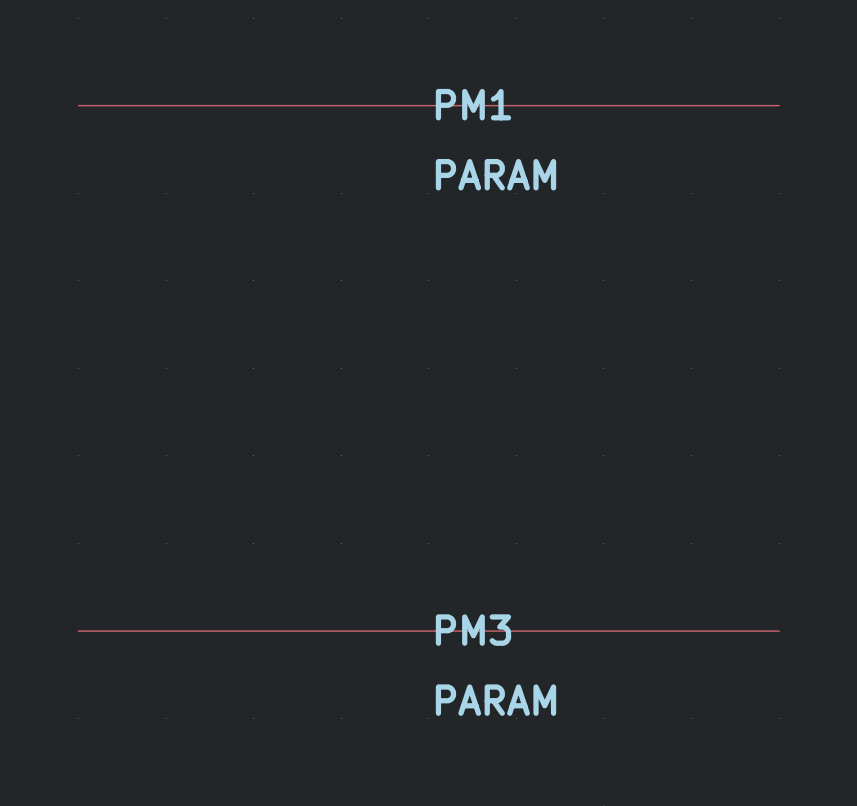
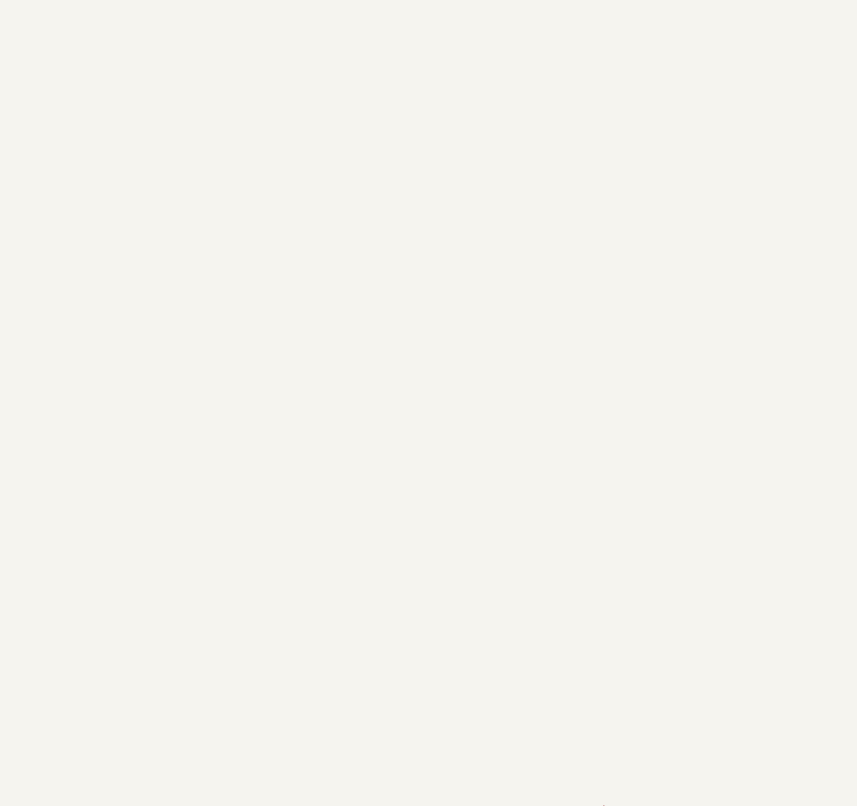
PM1: PARAM (428, 105) -> none
PM3: PARAM (428, 631) -> none

